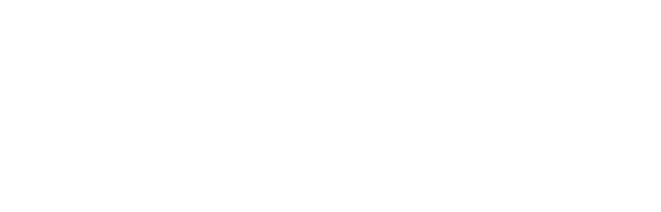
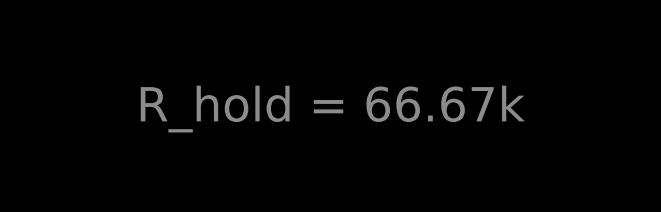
text: none -> R_hold = 66.67k (332, 109)

